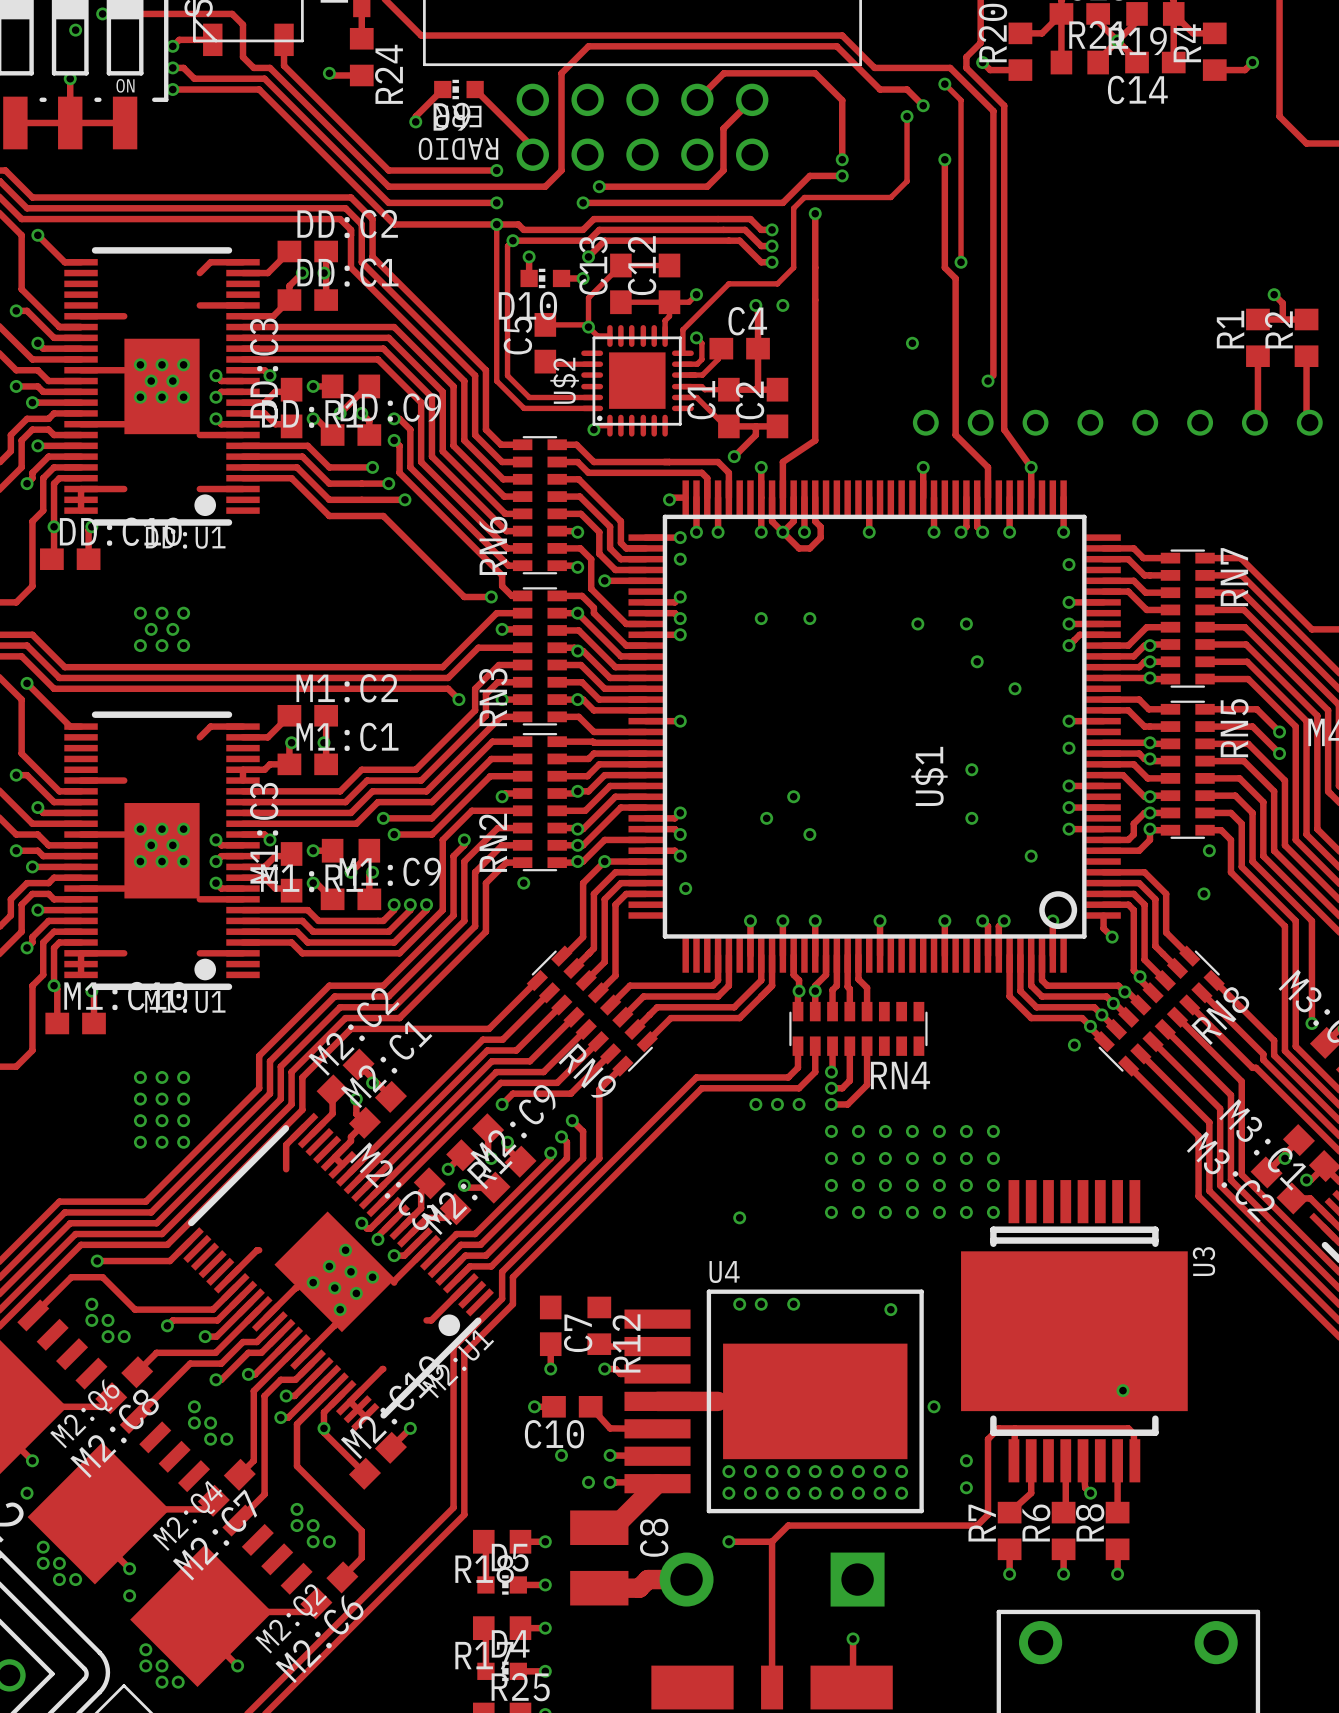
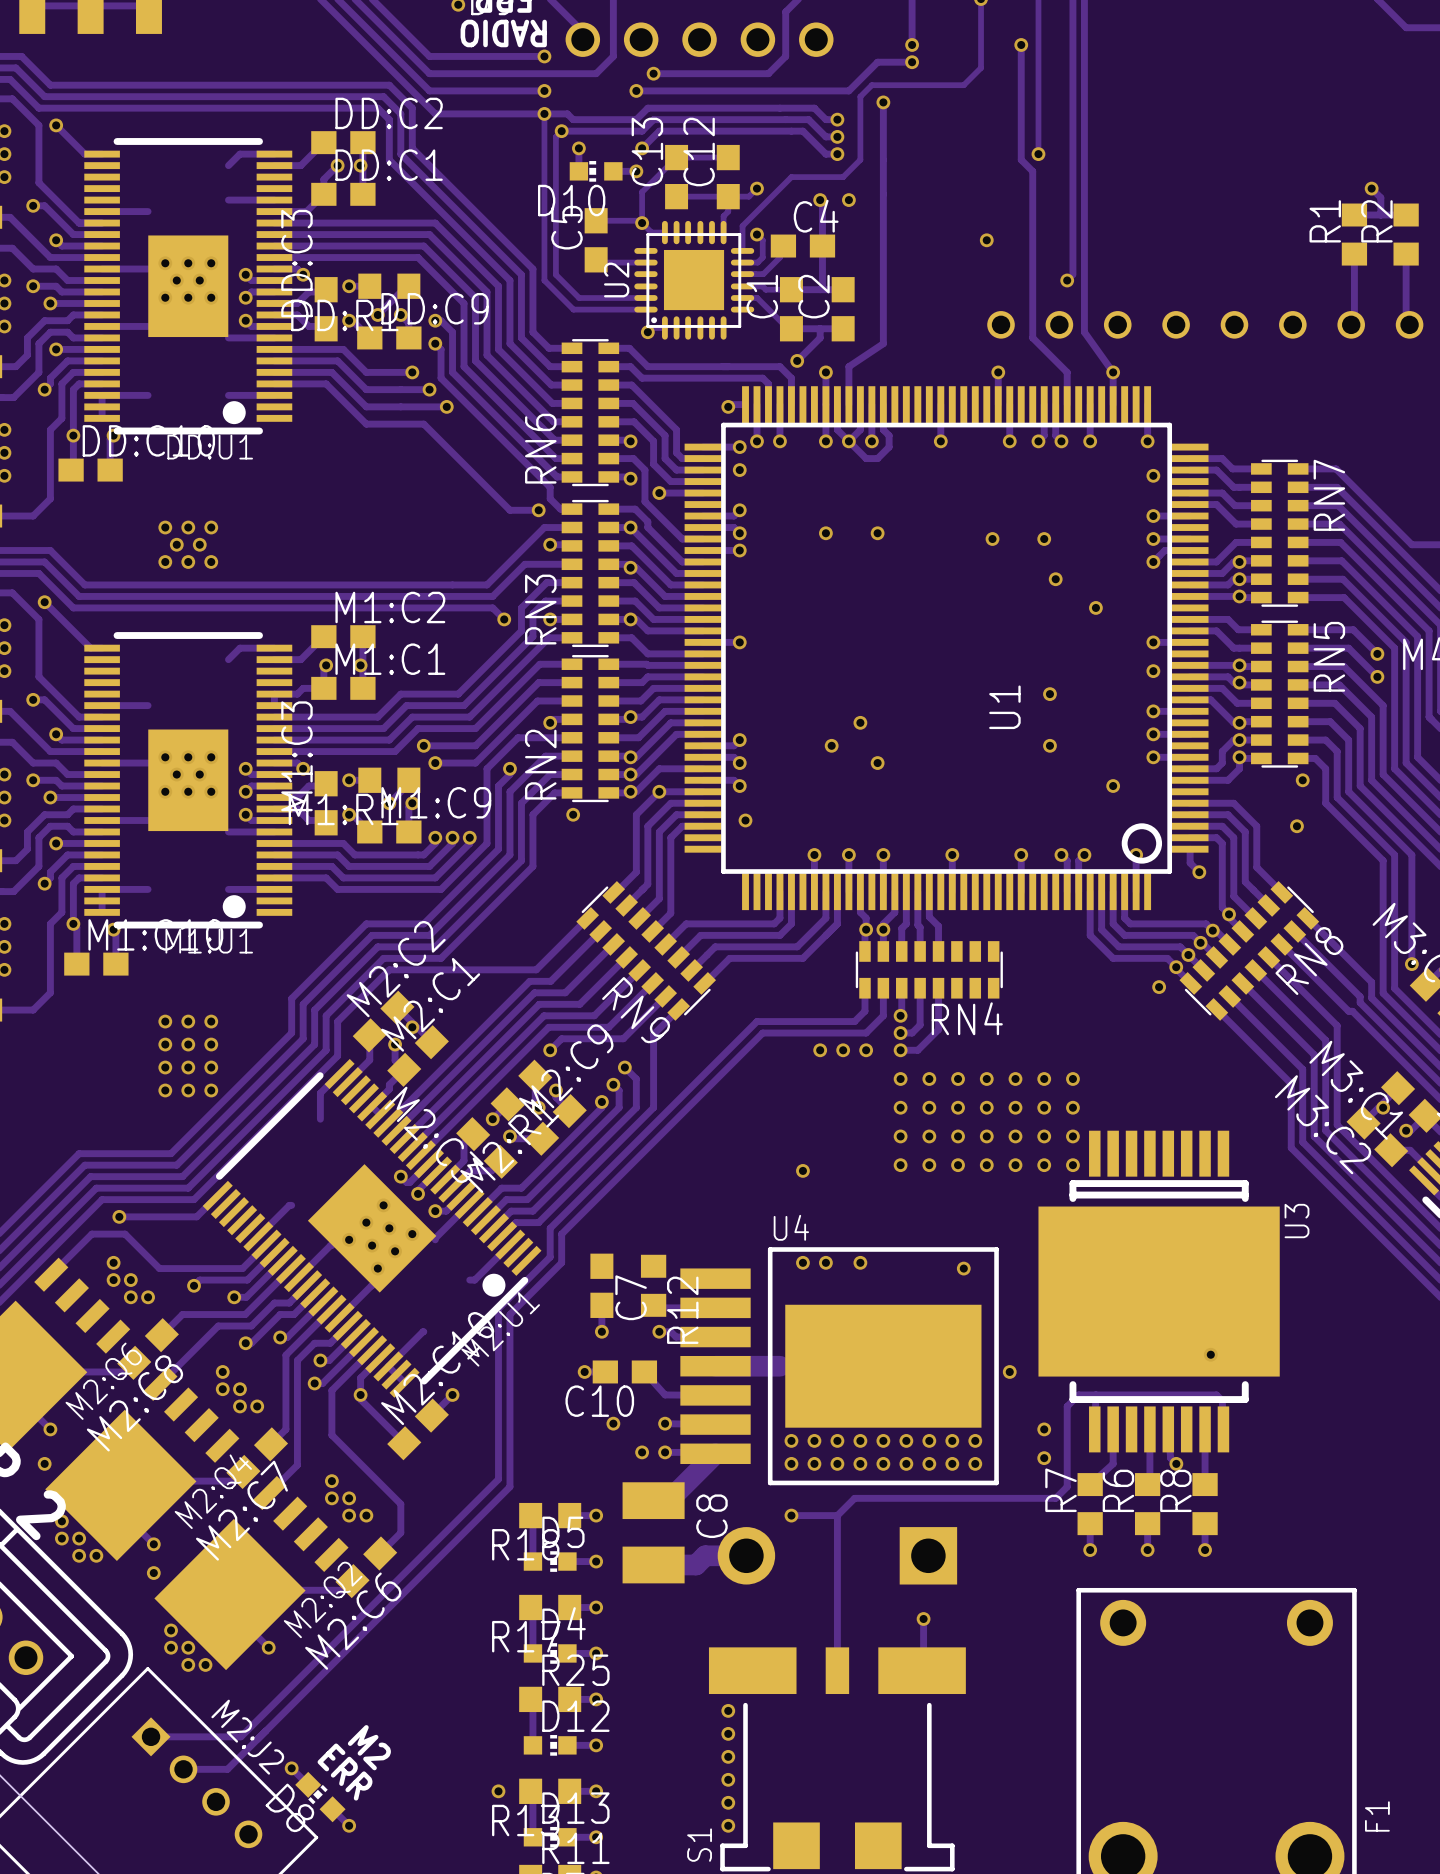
U$2 name: U$2 (564, 380) -> U2 (616, 280)
U$1 name: U$1 (929, 776) -> U1 (1004, 707)

